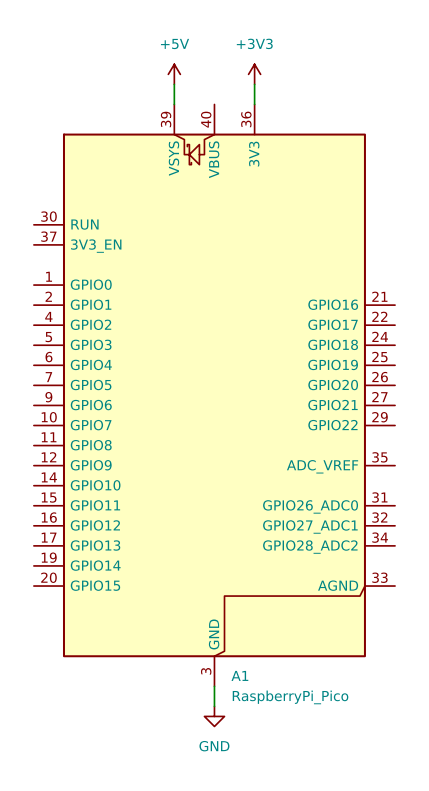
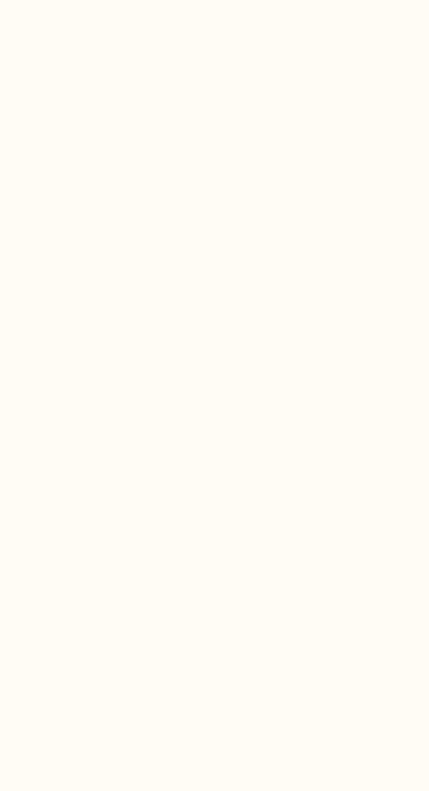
power symbol: +5V (174, 74) -> none
power symbol: +3V3 (254, 74) -> none
wire: (174, 84) (174, 104) -> none
wire: (254, 84) (254, 104) -> none
A1: RaspberryPi_Pico (214, 395) -> none
wire: (214, 686) (214, 706) -> none
power symbol: GND (214, 716) -> none

